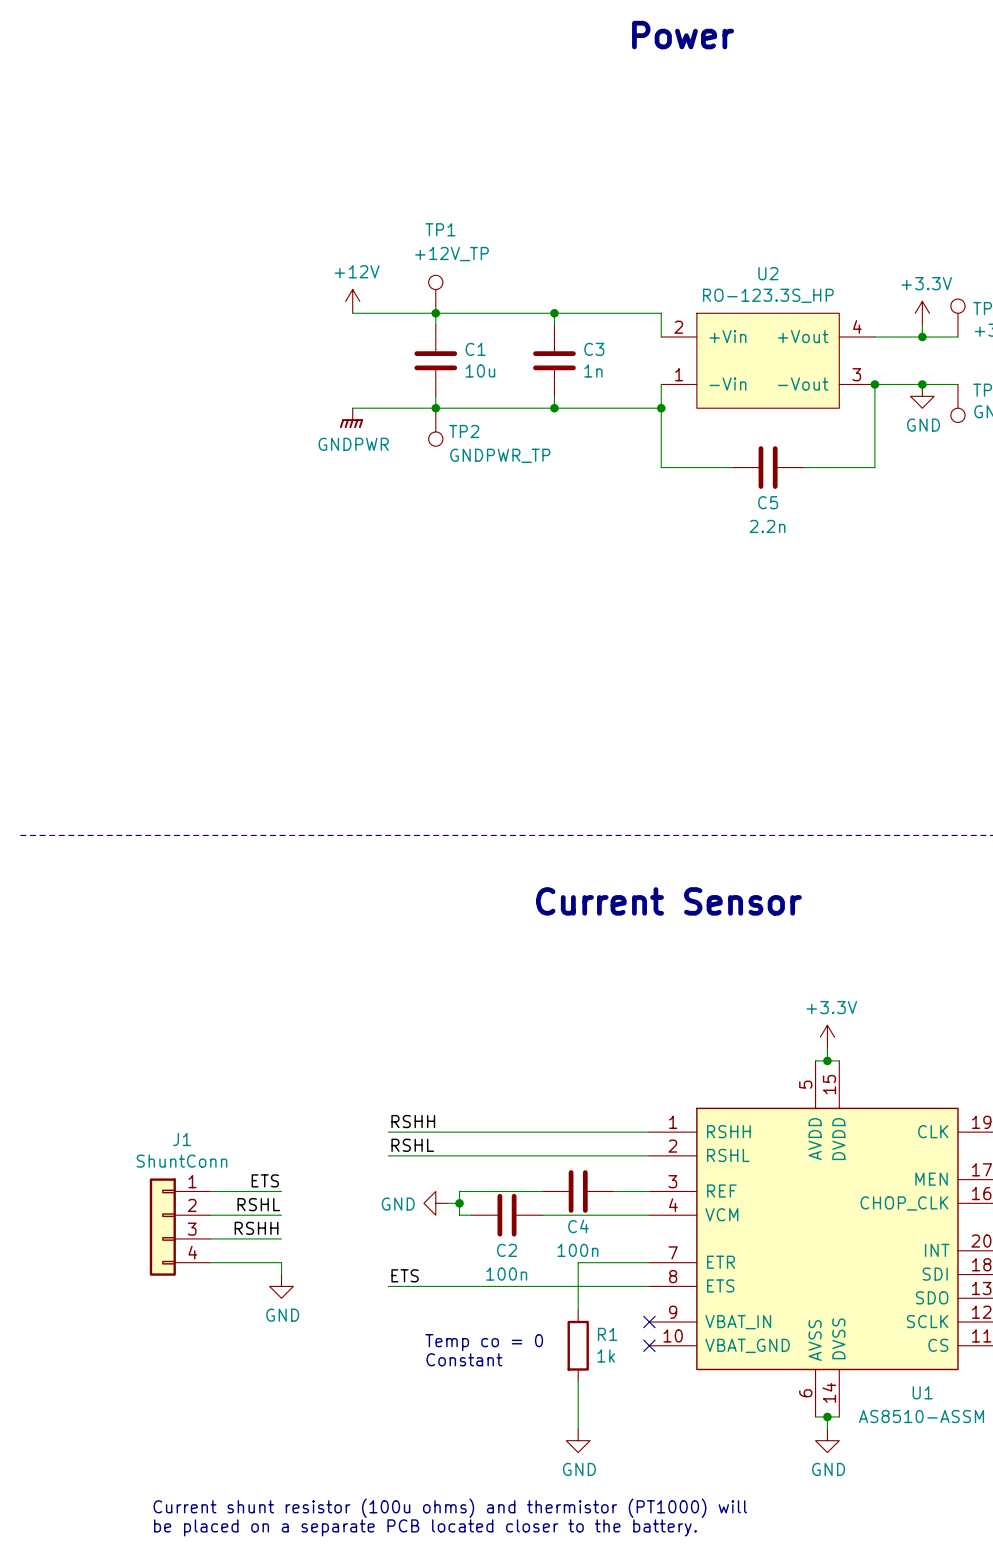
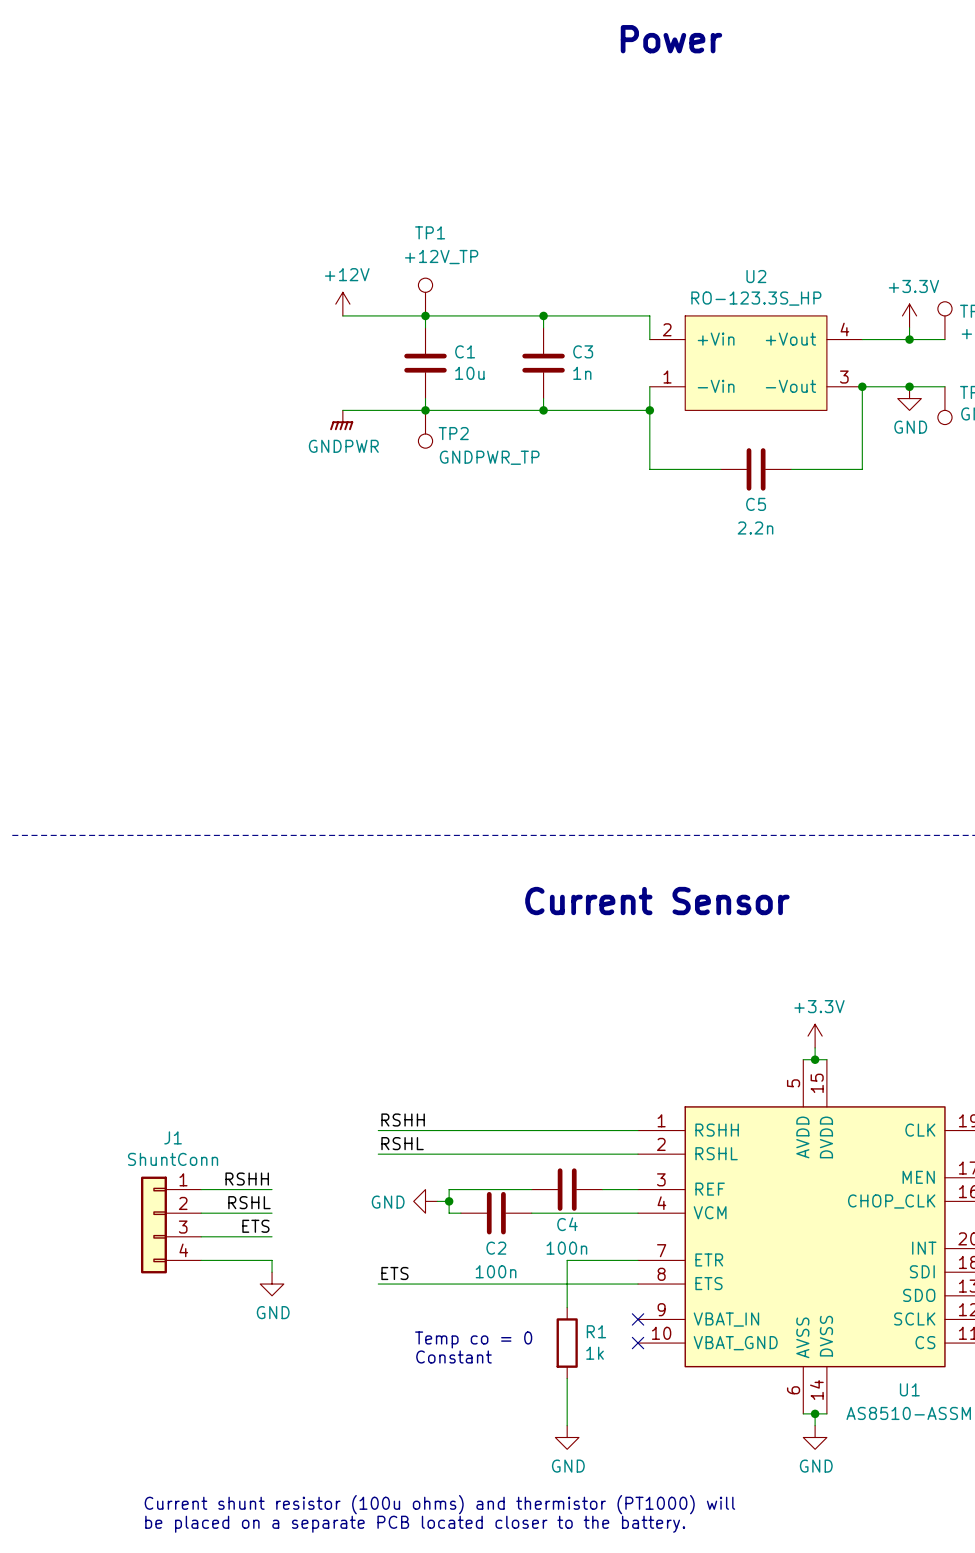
label: ETS (265, 1180) -> RSHH (247, 1179)
label: RSHH (256, 1228) -> ETS (255, 1226)

